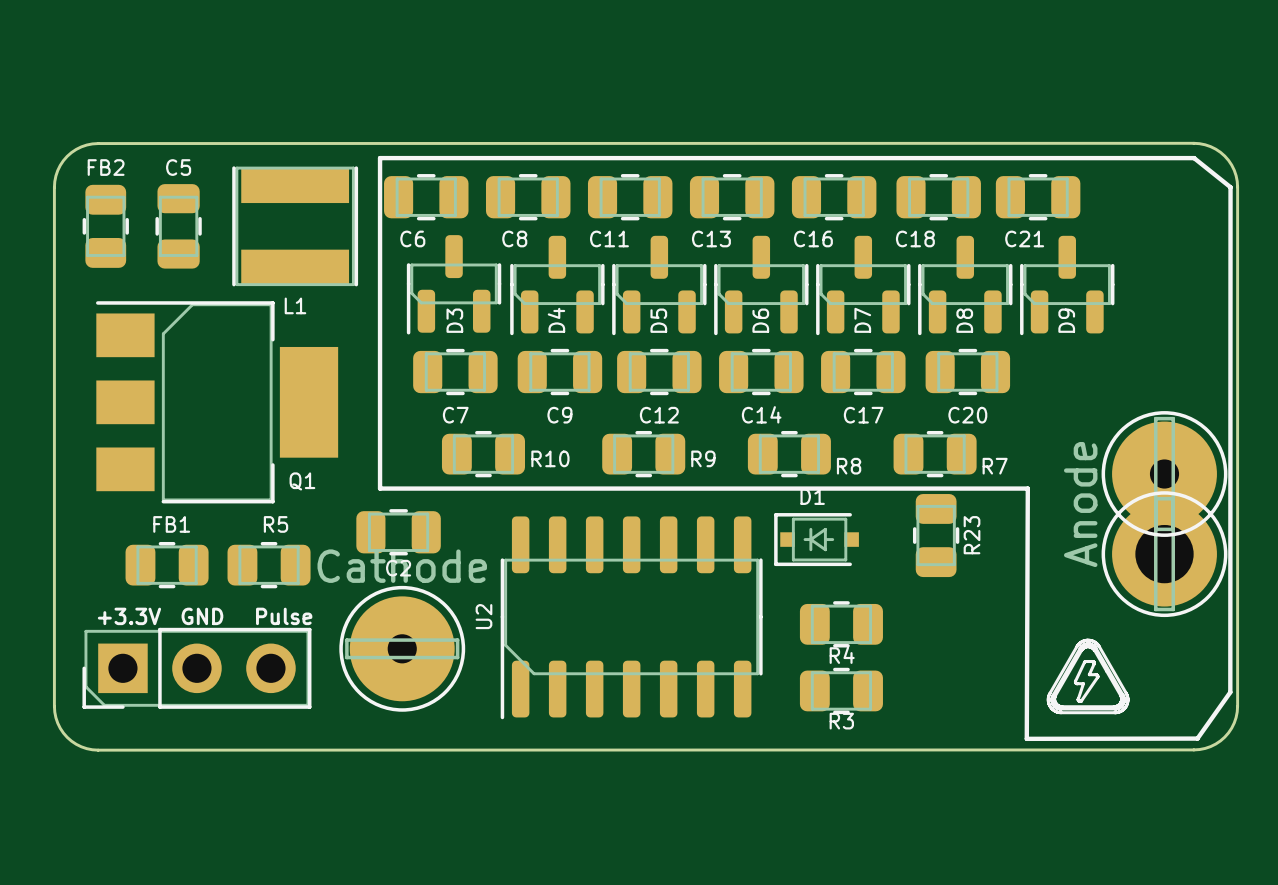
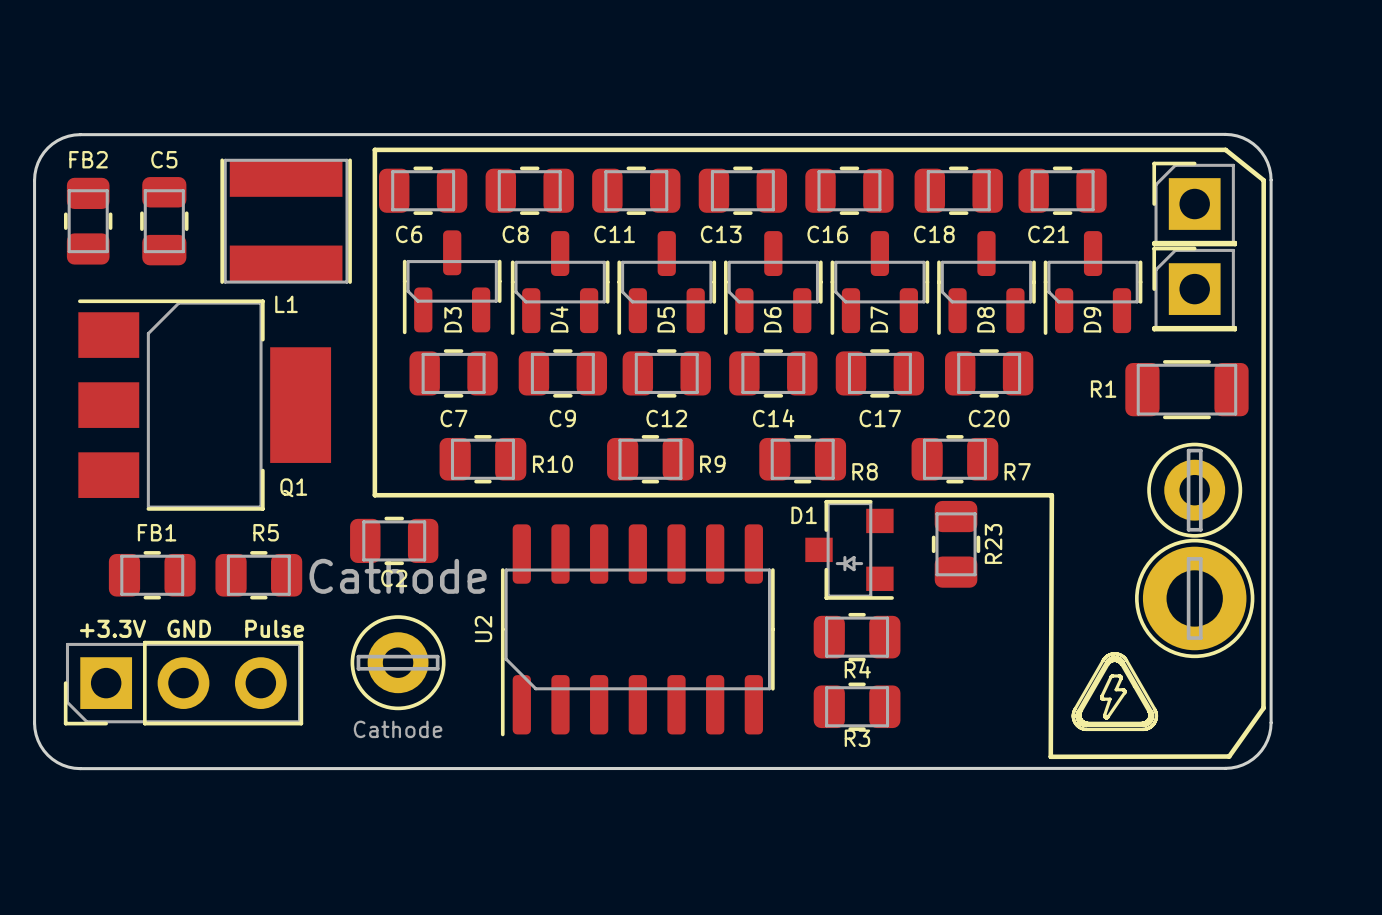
part: none -> (1194, 204)
part: none -> (1194, 289)
R1: none -> (1186, 389)
part footprint: [1101, 411, 1228, 537] -> [1147, 442, 1243, 538]
part value: Anode (1080, 504) -> none
D1 footprint: [774, 513, 859, 567] -> [805, 499, 894, 600]
part: (1164, 554) -> none
part footprint: [339, 585, 466, 712] -> [350, 615, 446, 711]
part: none -> (1194, 598)

